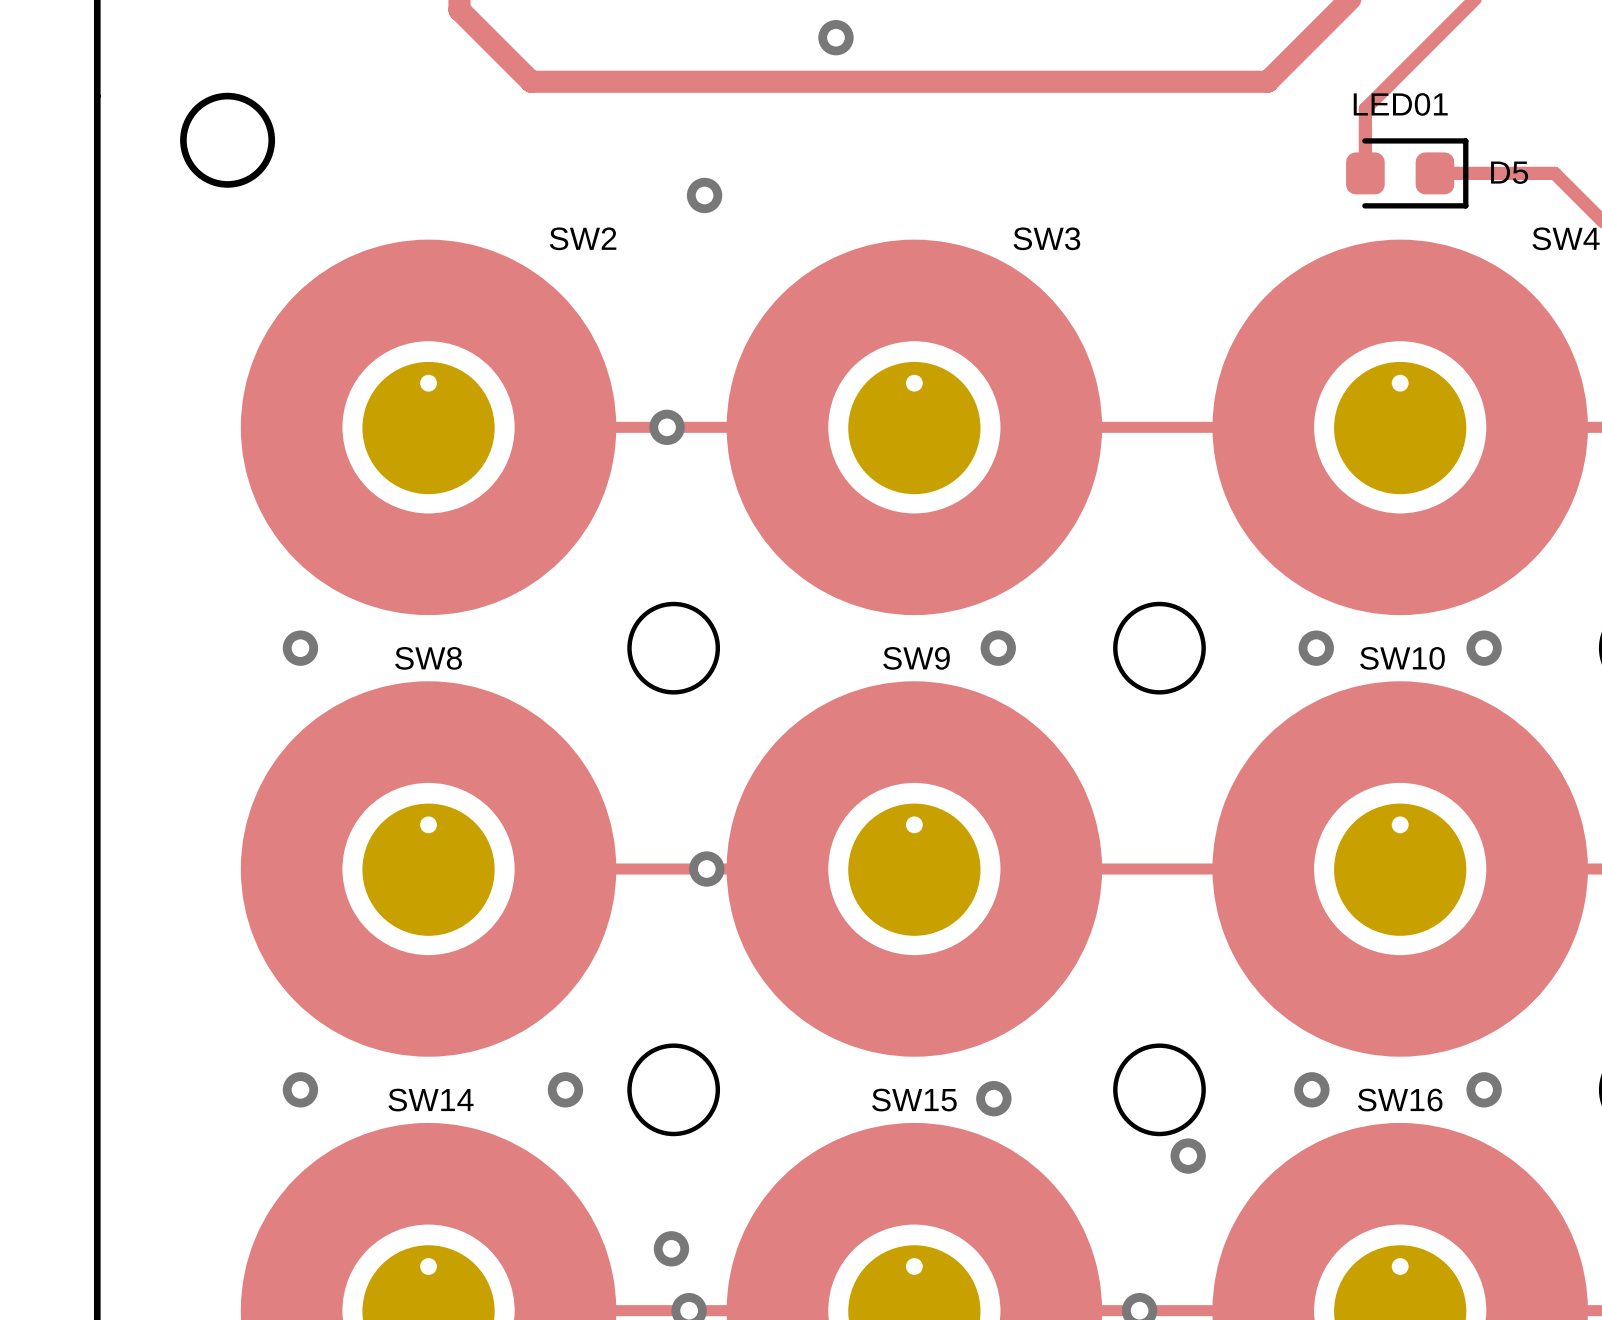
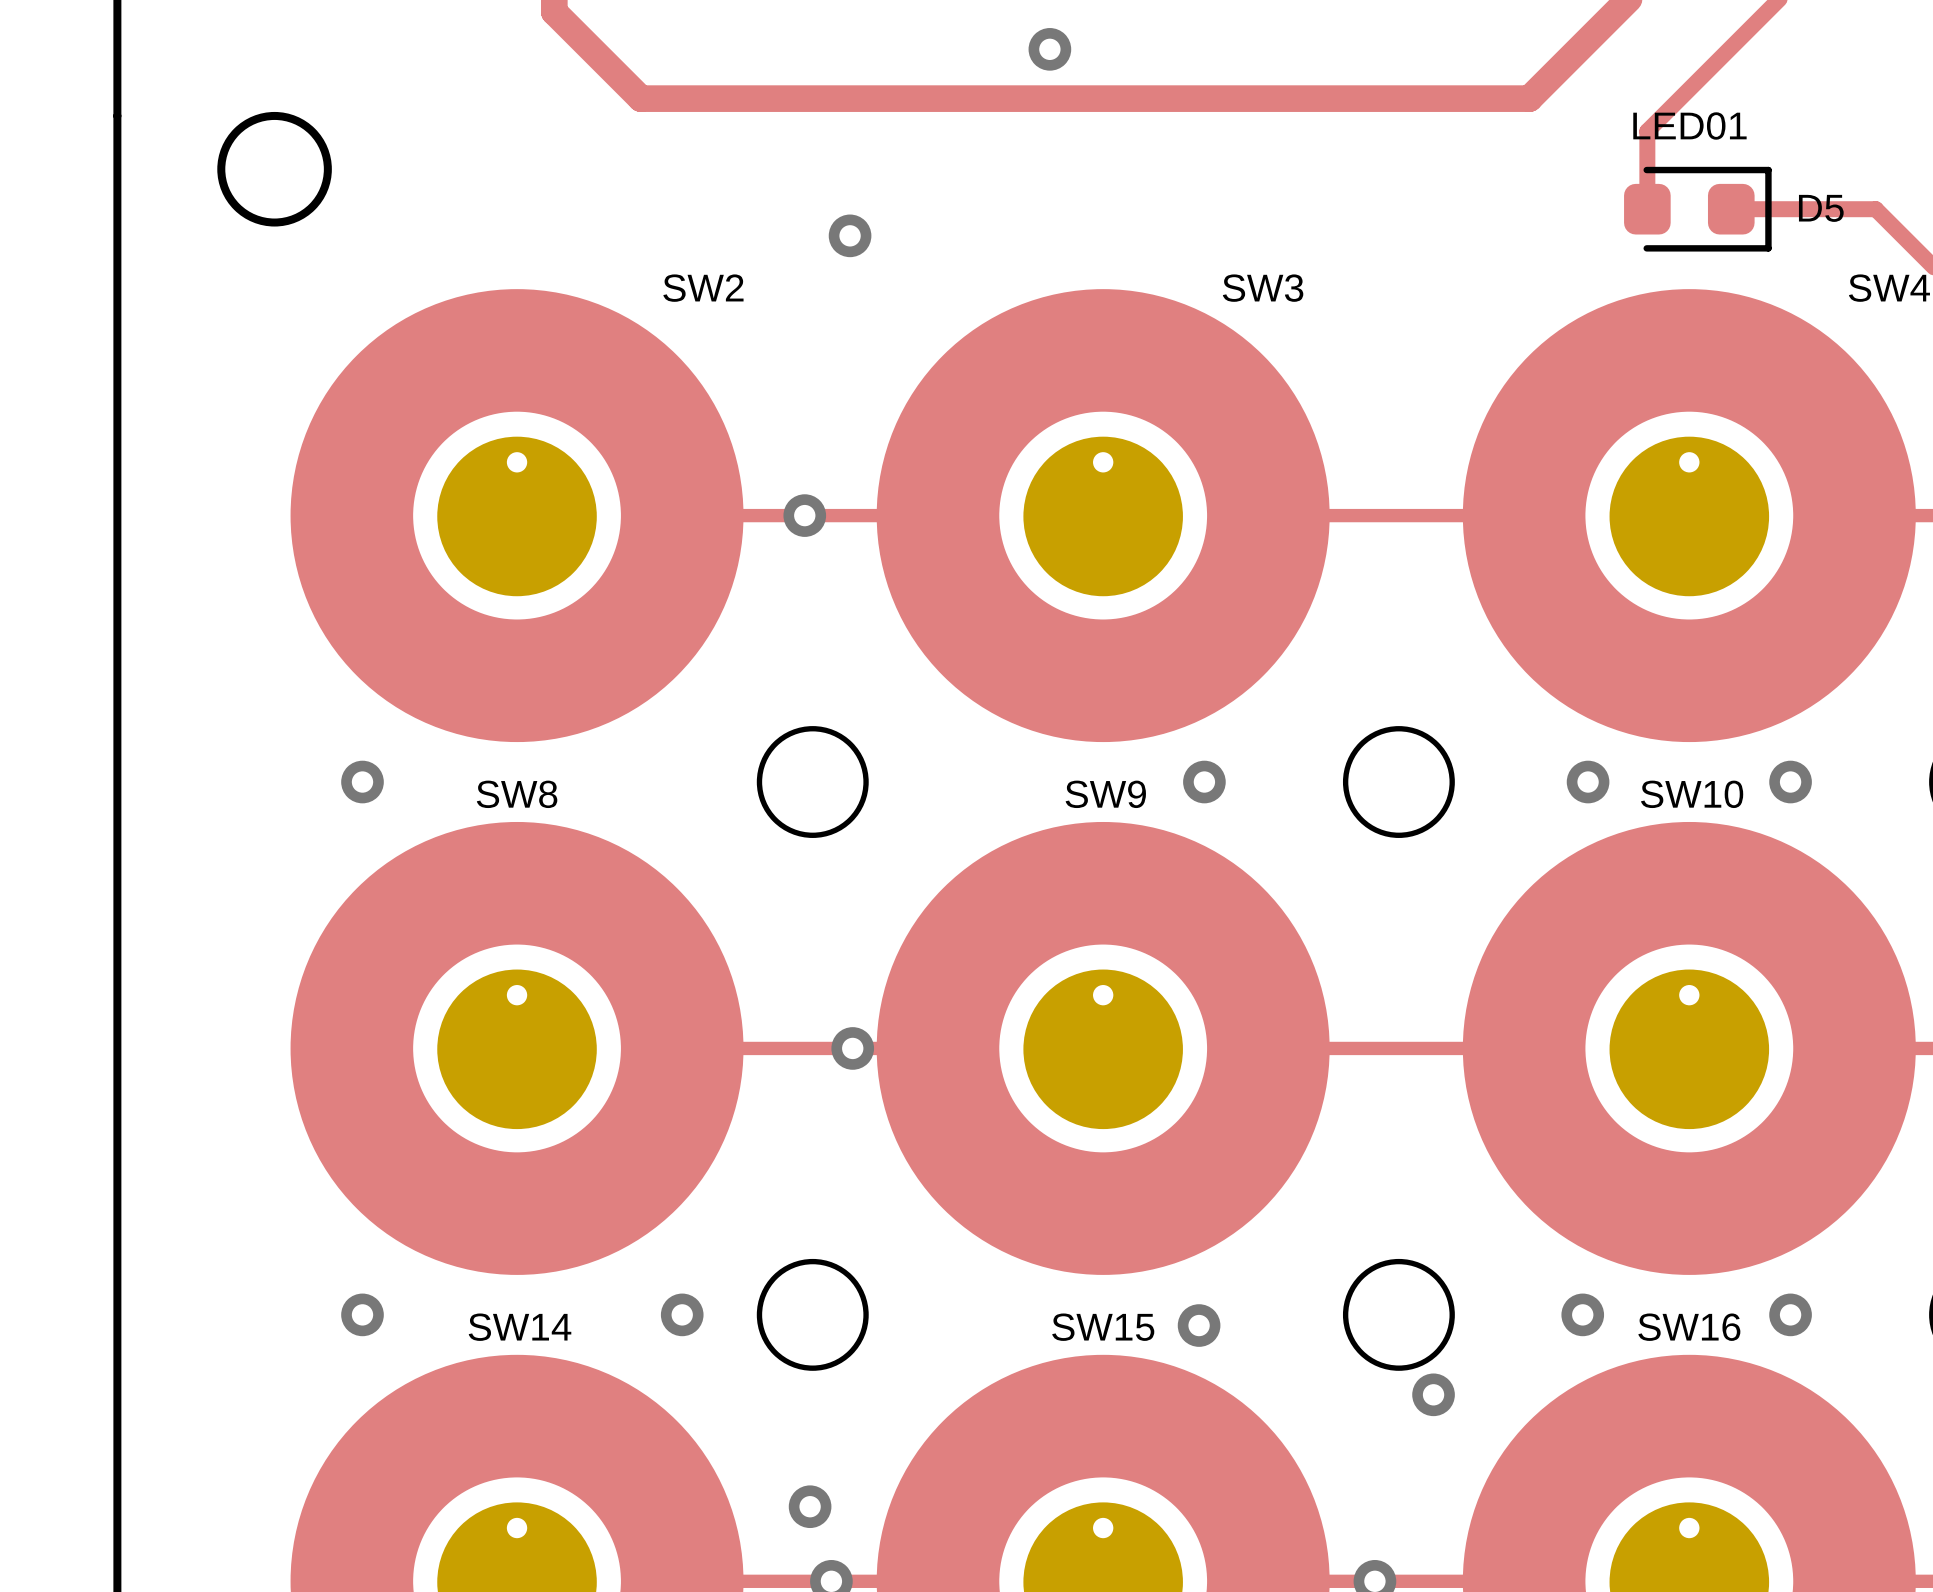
via position: (835, 37) -> (1049, 49)

